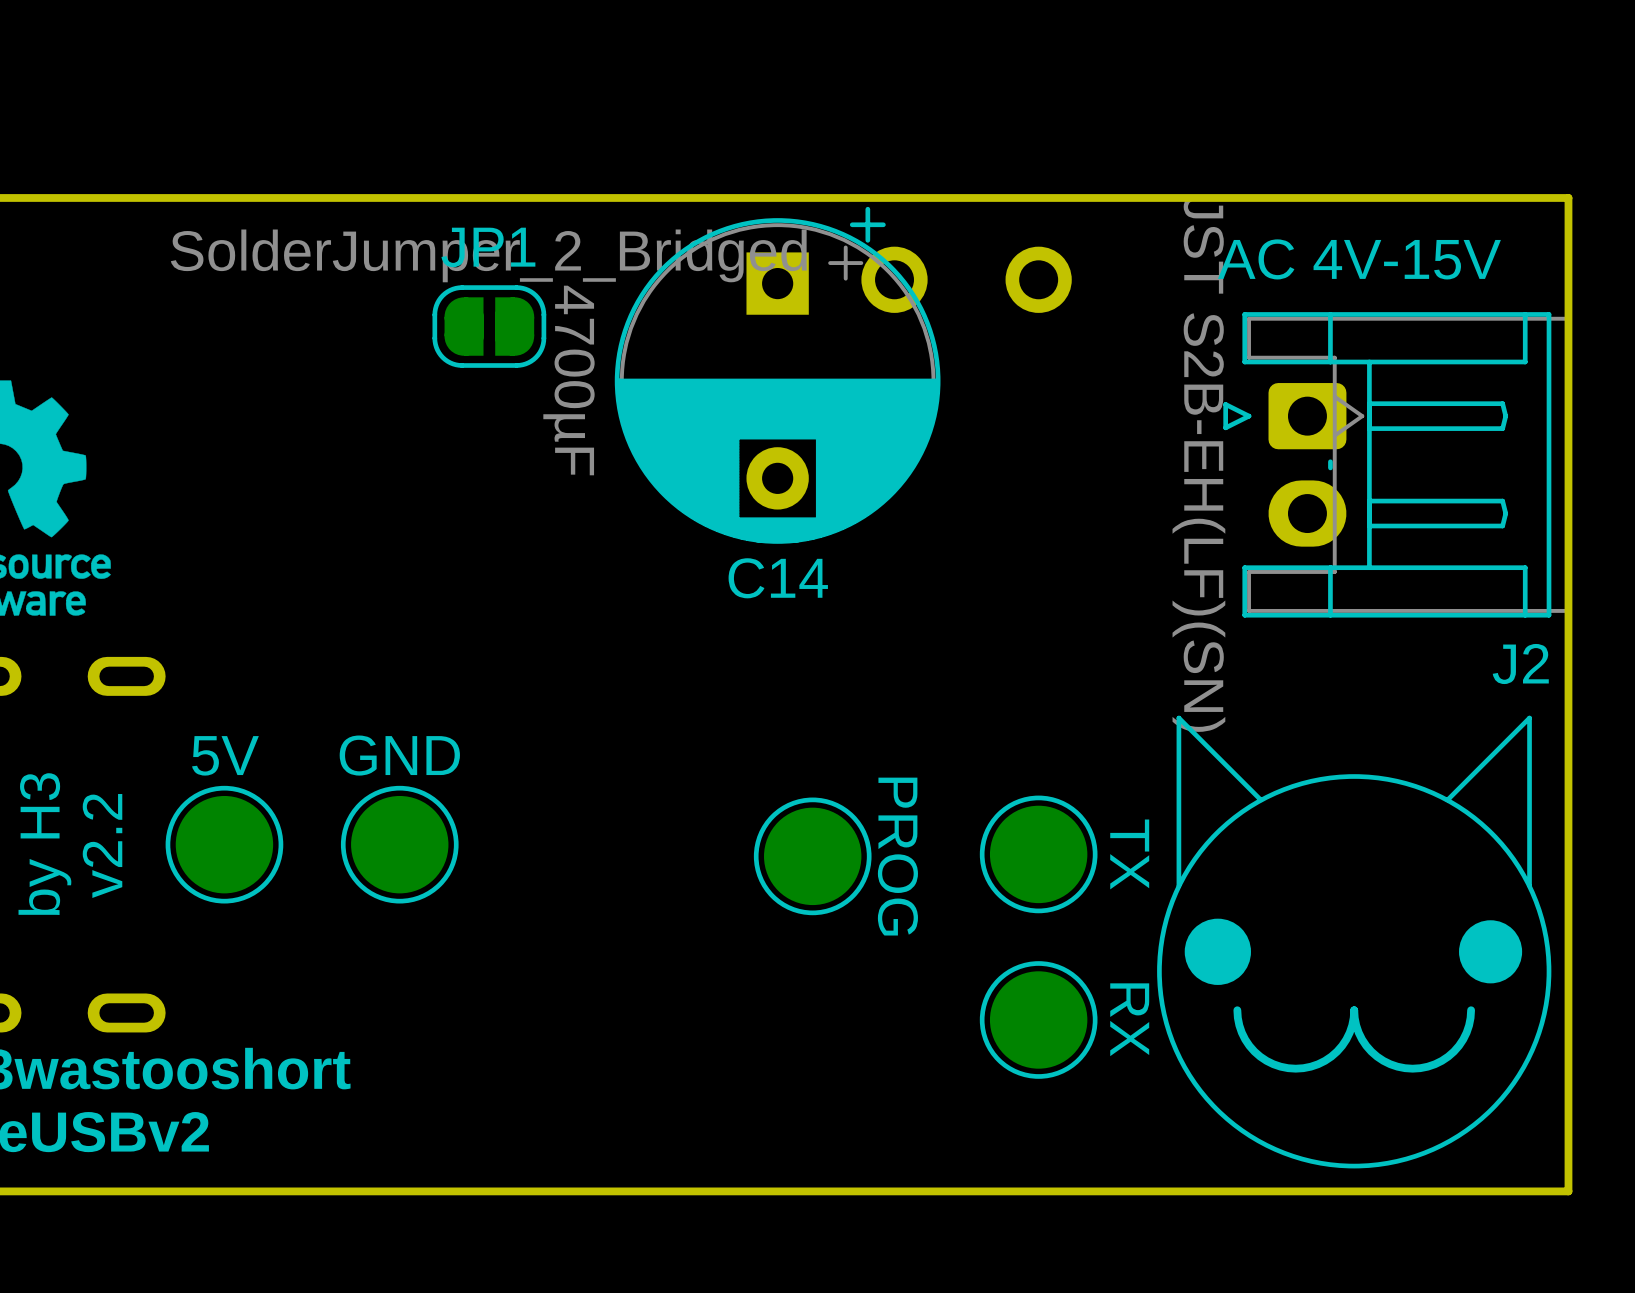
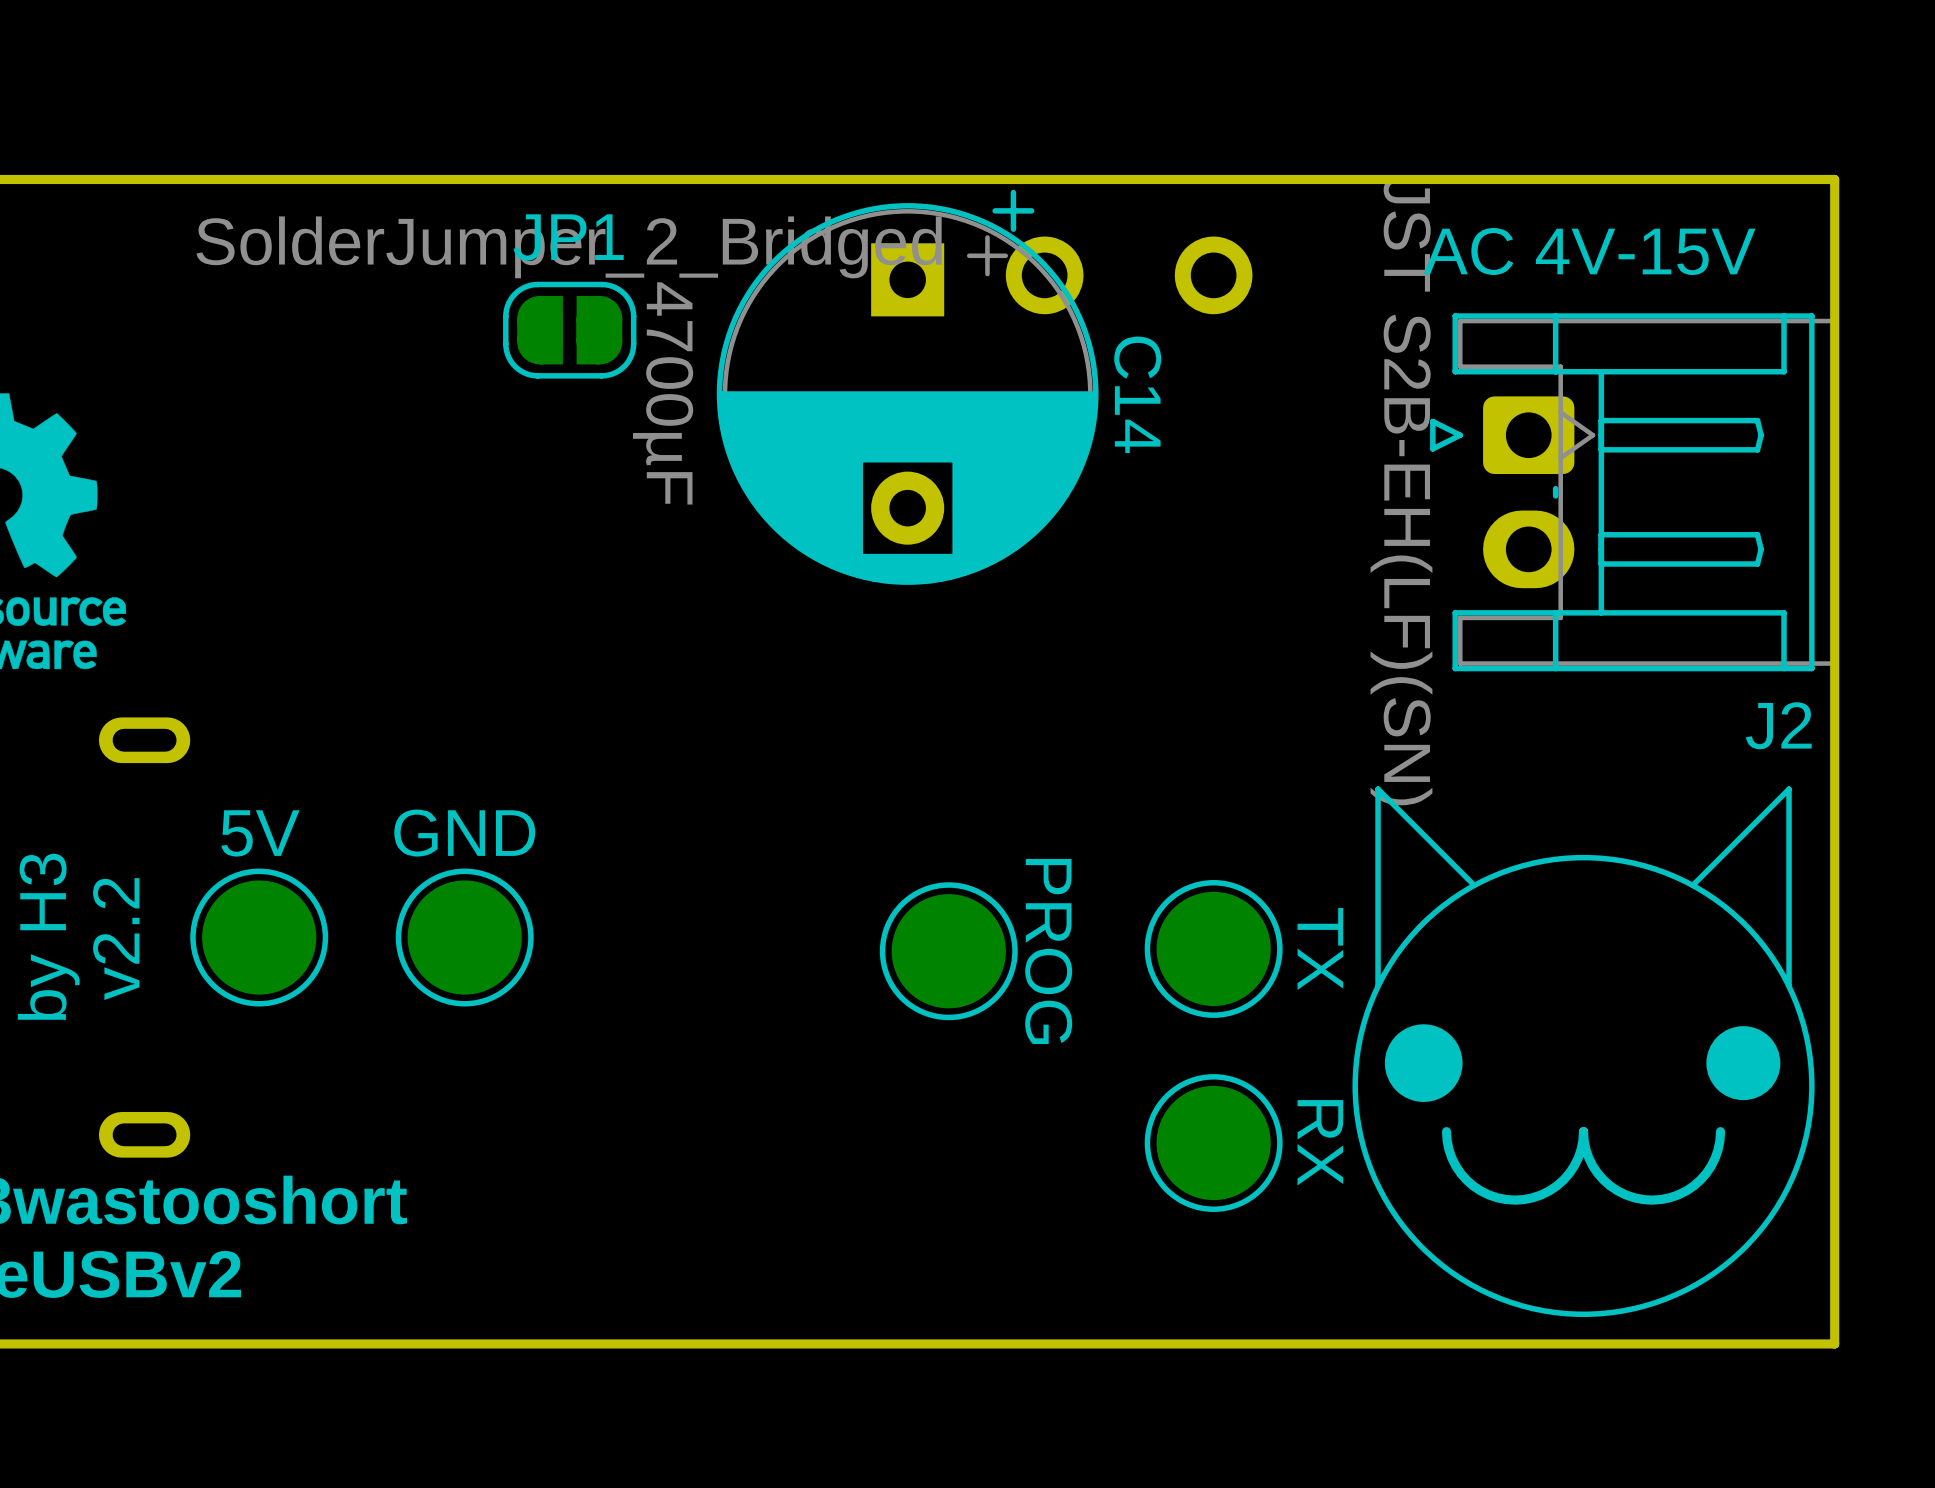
C14 name rotation: 0° (778, 578) -> 90° clockwise (1137, 394)
C14 name position: C14 (778, 578) -> C14 (1137, 394)

